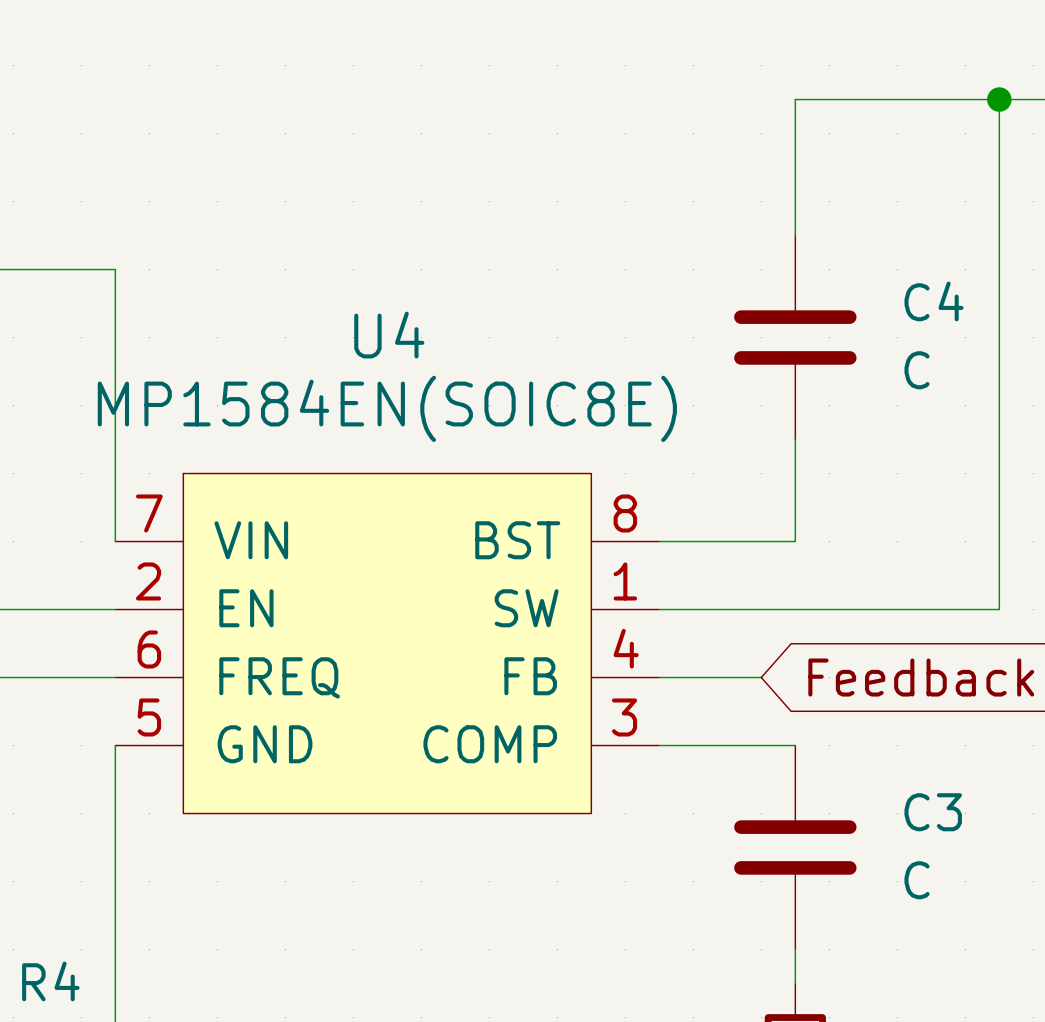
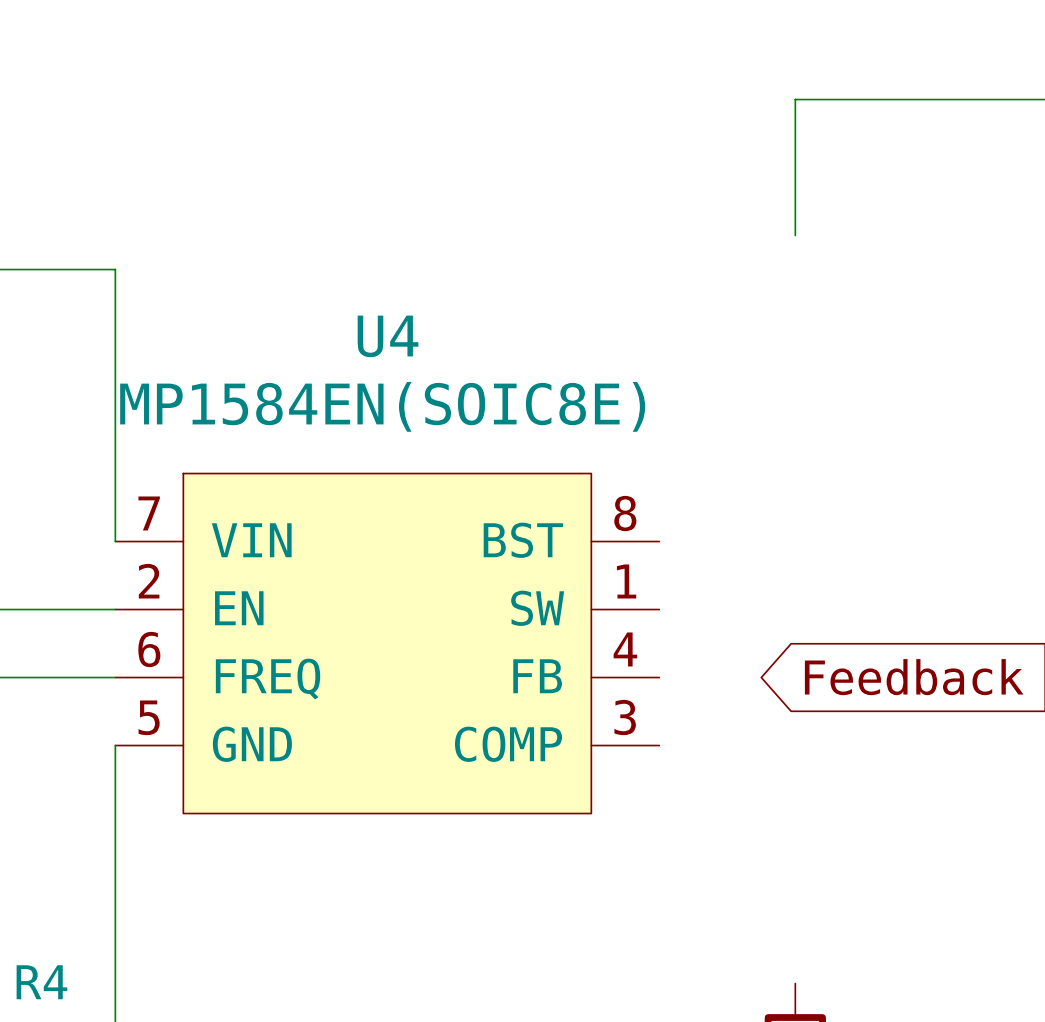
wire: (999, 99) (999, 609) (659, 609) -> none
junction: (999, 99) -> none
C4: C (795, 337) -> none
wire: (795, 439) (795, 541) (659, 541) -> none
wire: (659, 677) (761, 677) -> none
wire: (659, 745) (795, 745) -> none
C3: C (795, 847) -> none
wire: (795, 949) (795, 983) -> none

